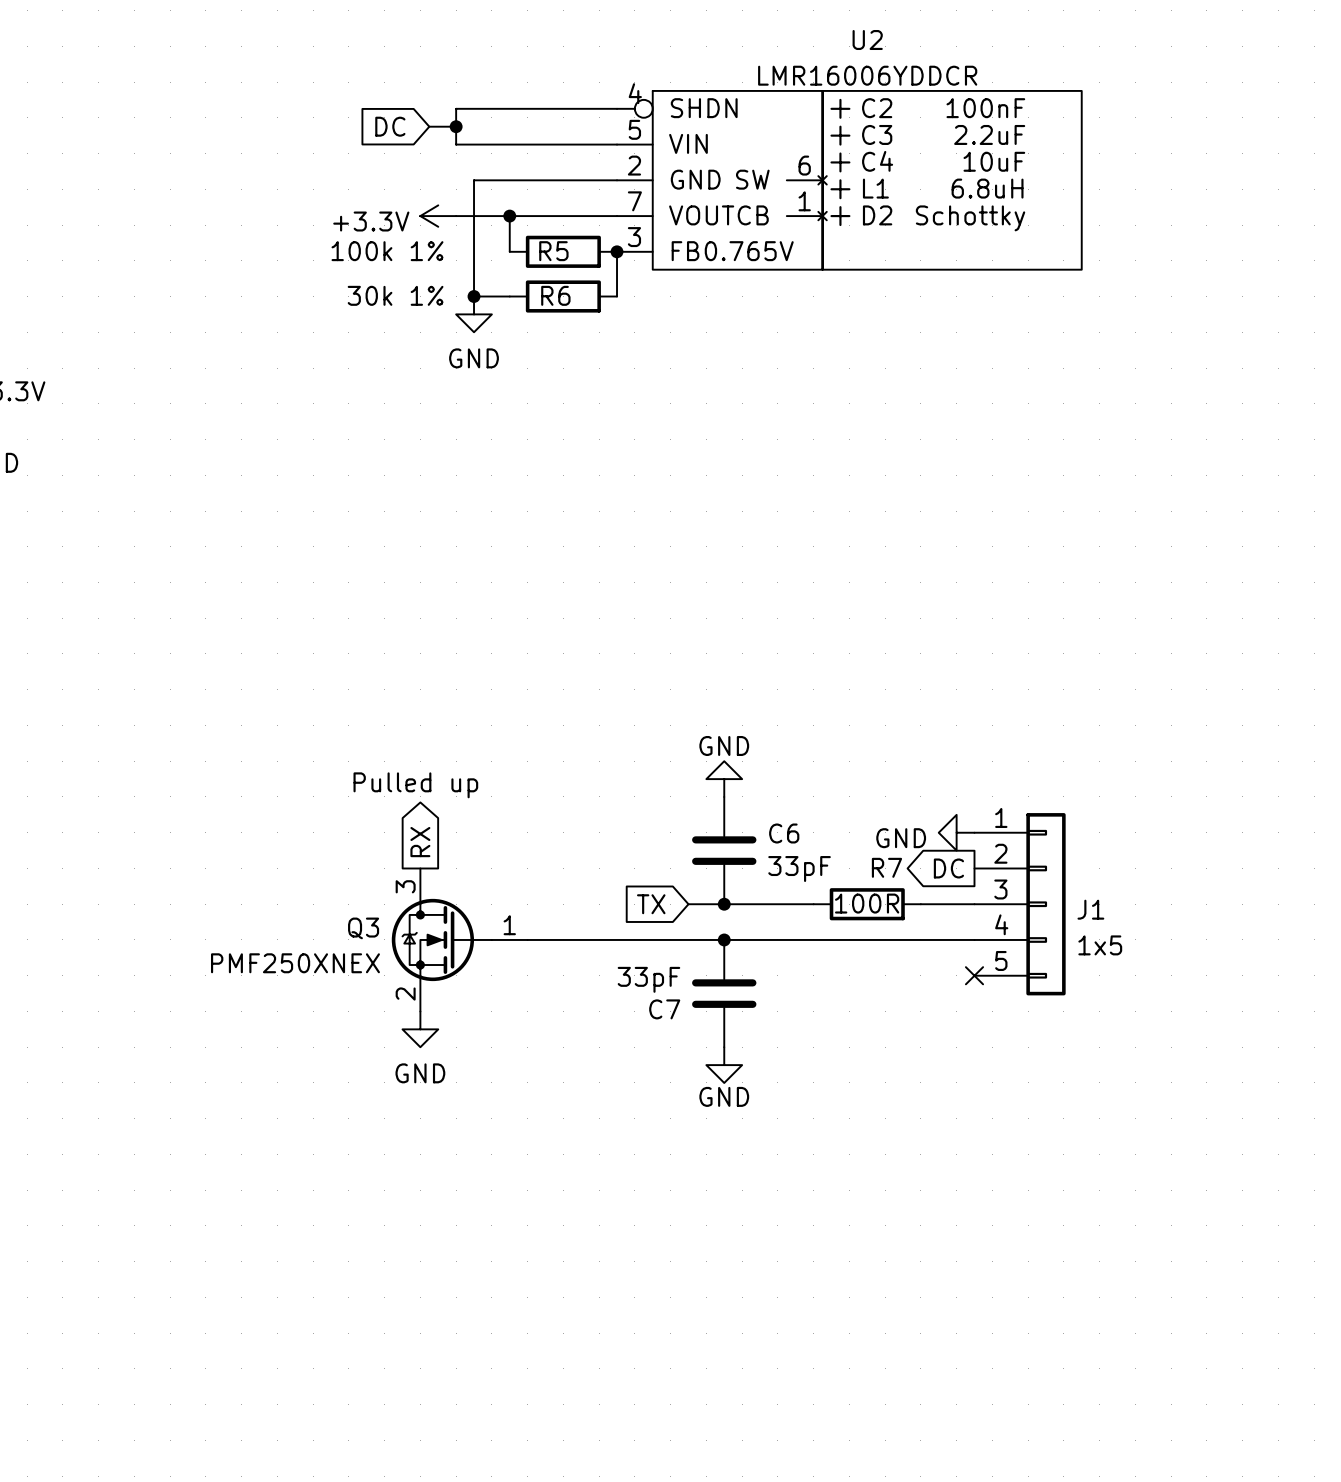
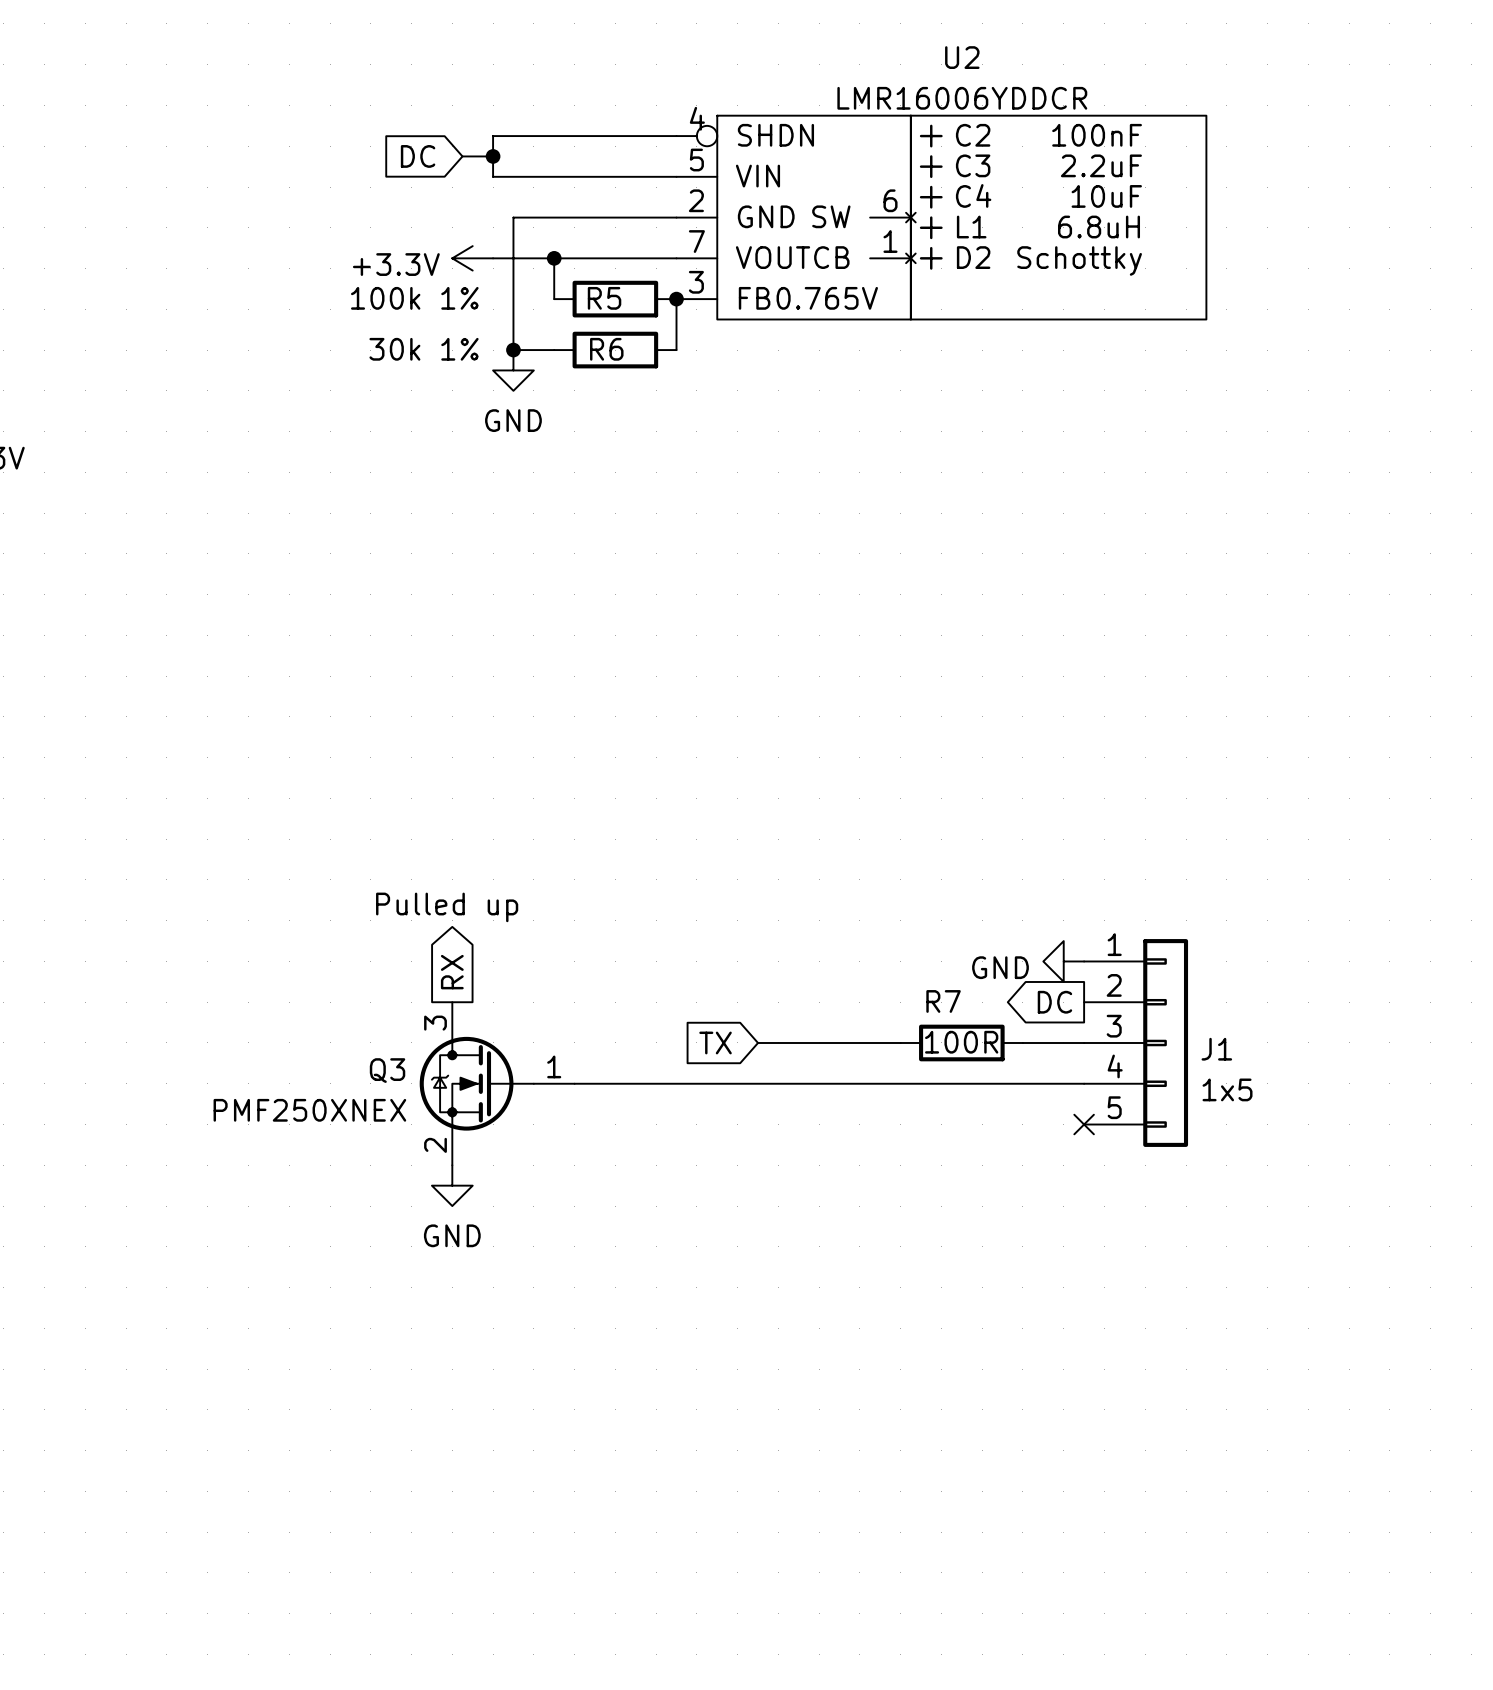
power symbol: GND (724, 779) -> none
C6: 33pF (724, 850) -> none
R7 name position: R7 (886, 867) -> R7 (943, 1001)
junction: (724, 904) -> none
junction: (724, 939) -> none
C7: 33pF (724, 993) -> none
power symbol: GND (724, 1065) -> none

